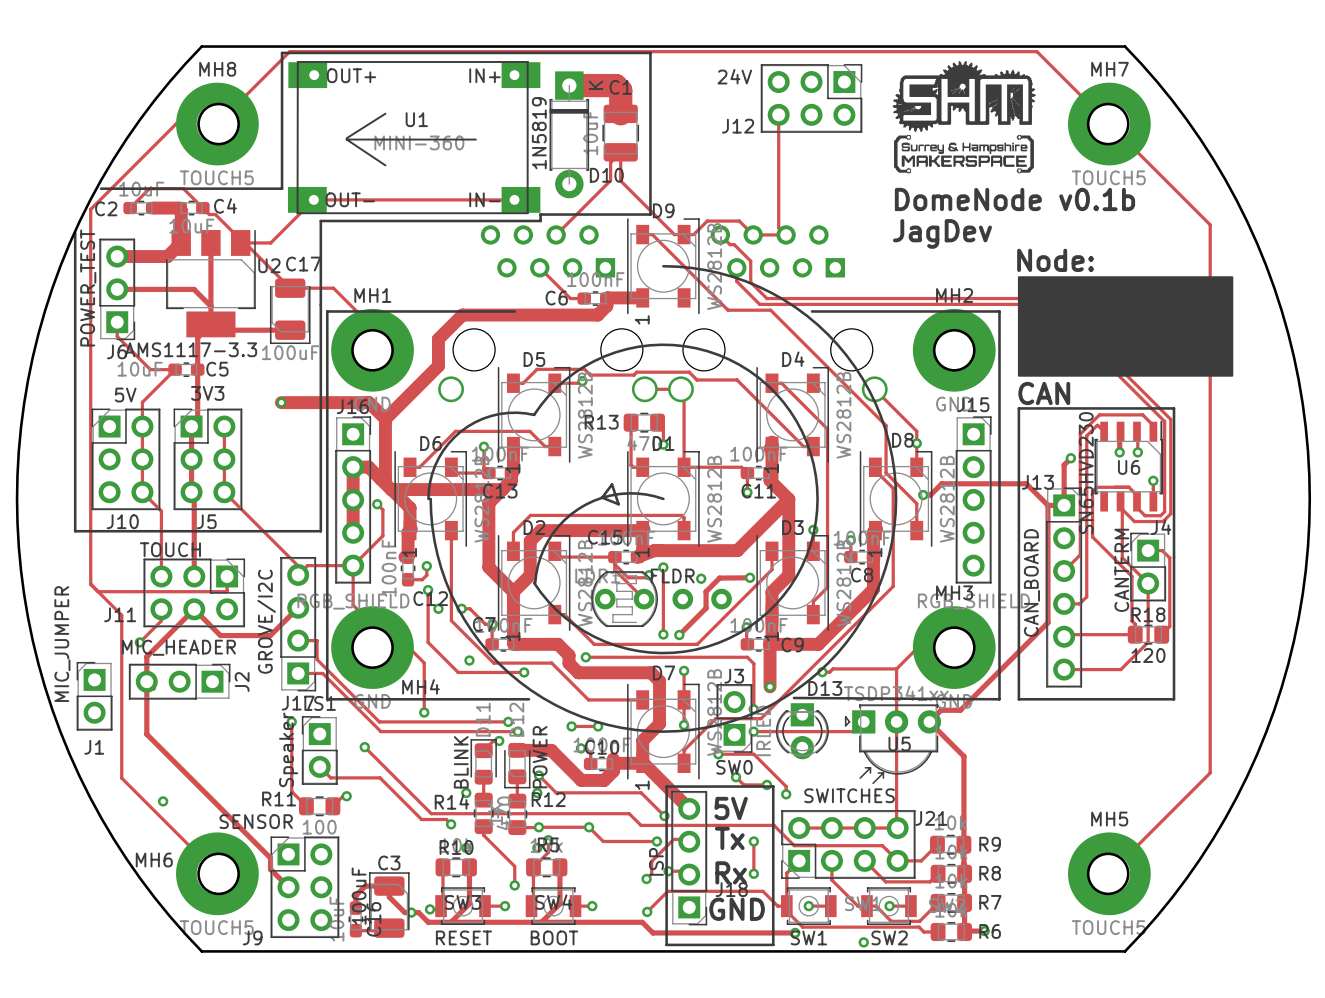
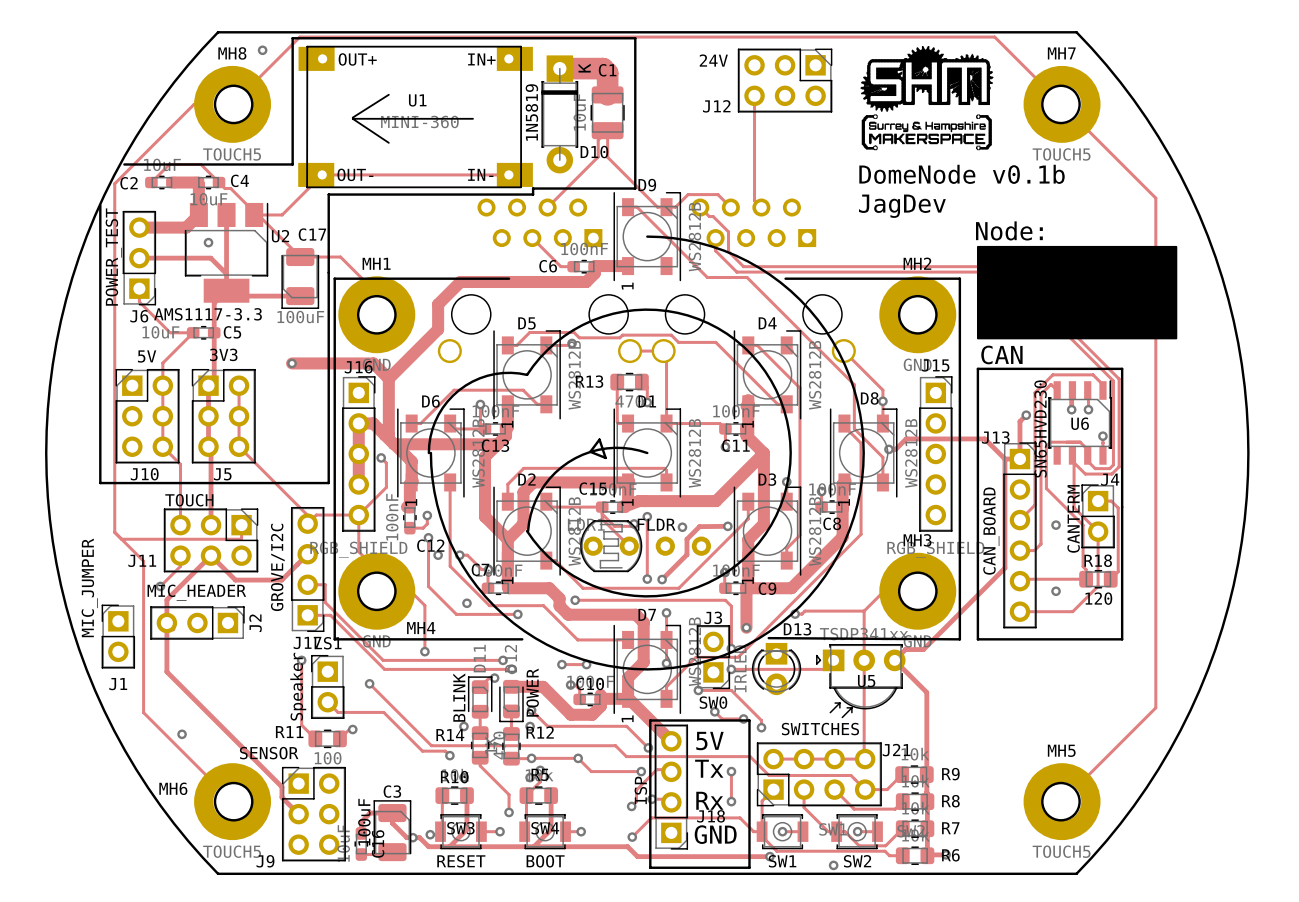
via: none -> (262, 50)
track: (753, 234) (786, 234) -> none
via: none -> (208, 242)
via: none -> (1056, 525)
via: none -> (1056, 591)

